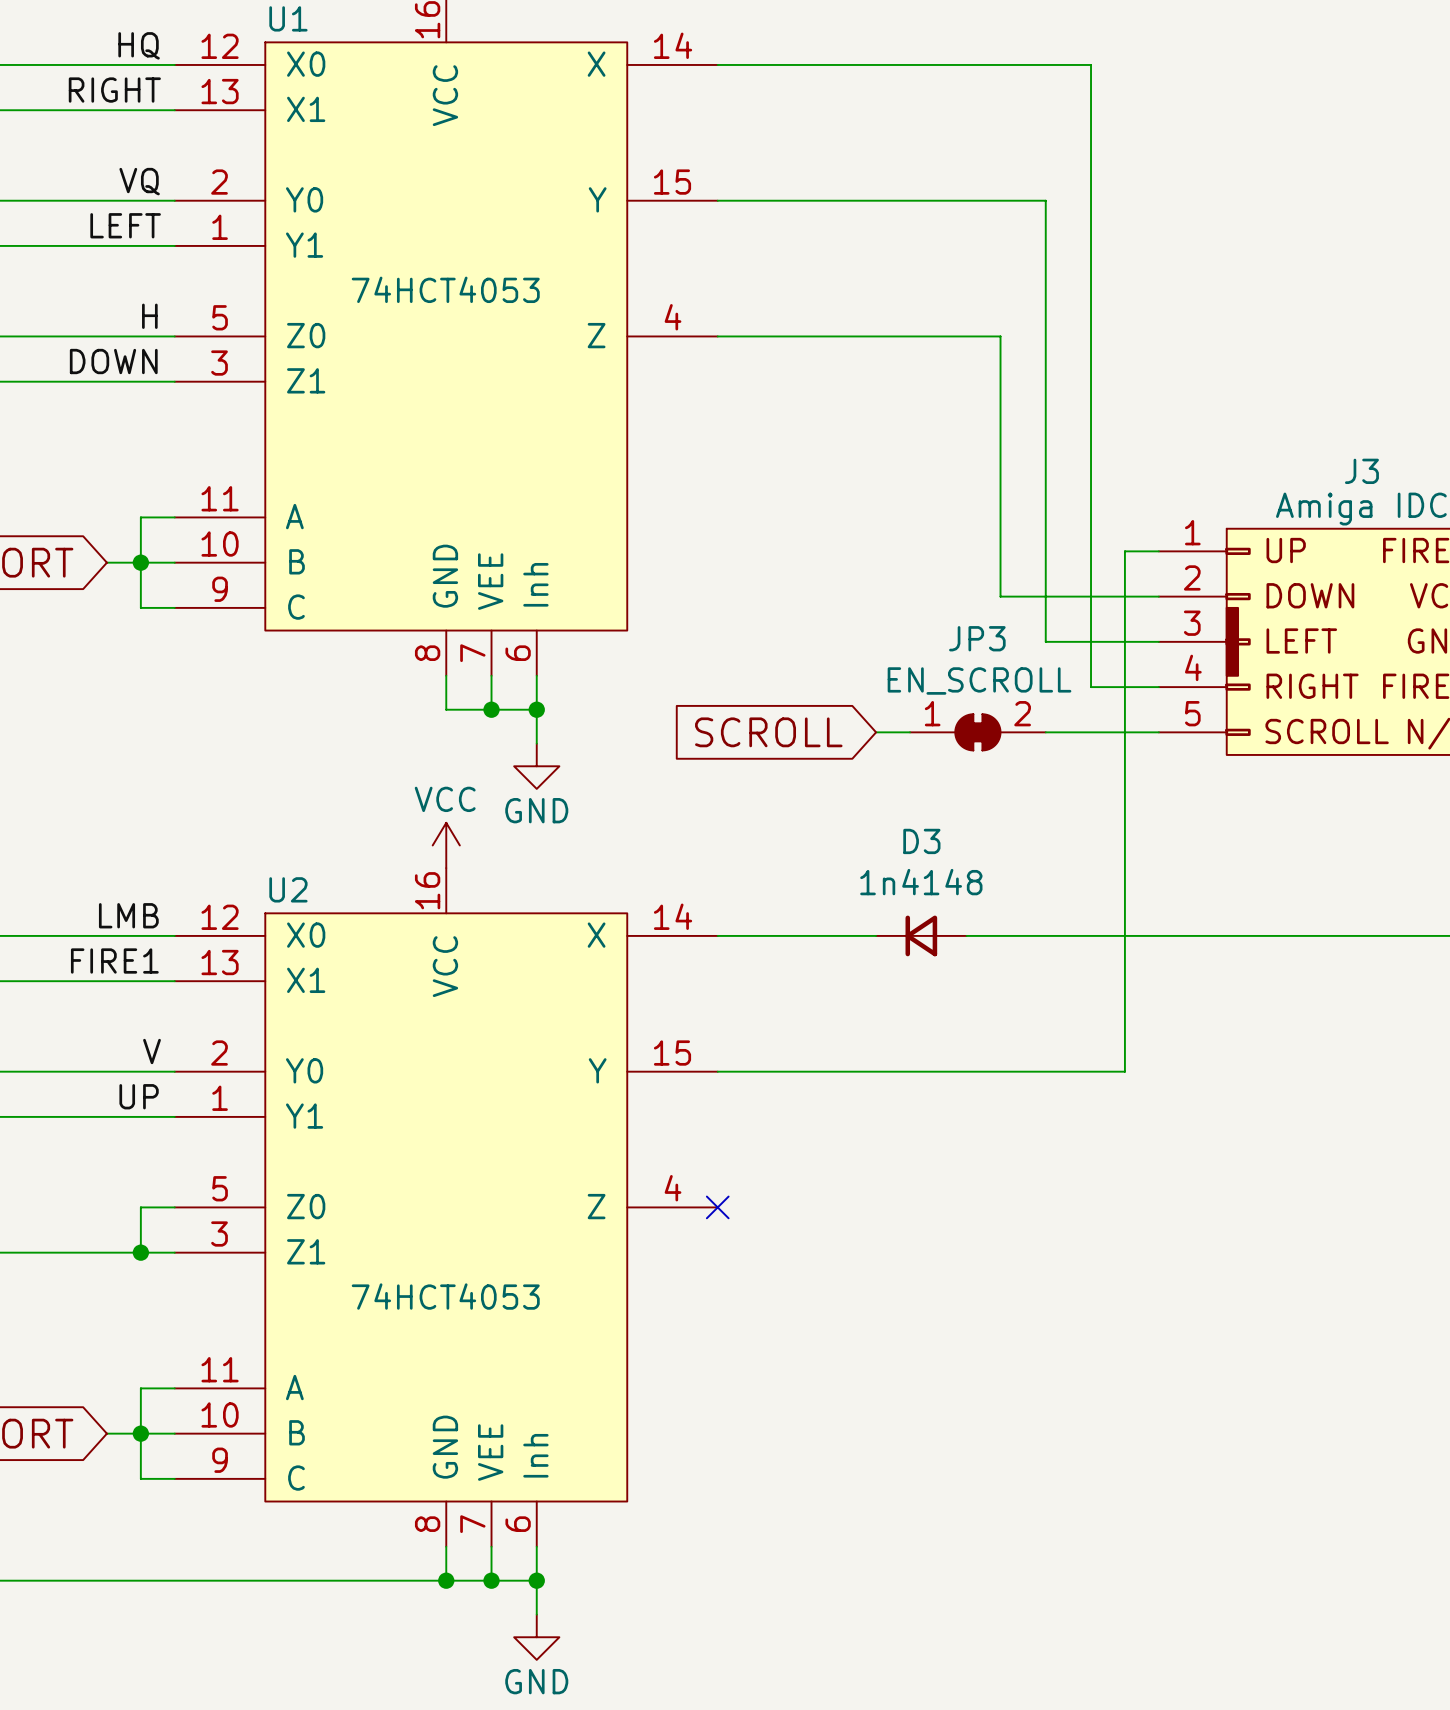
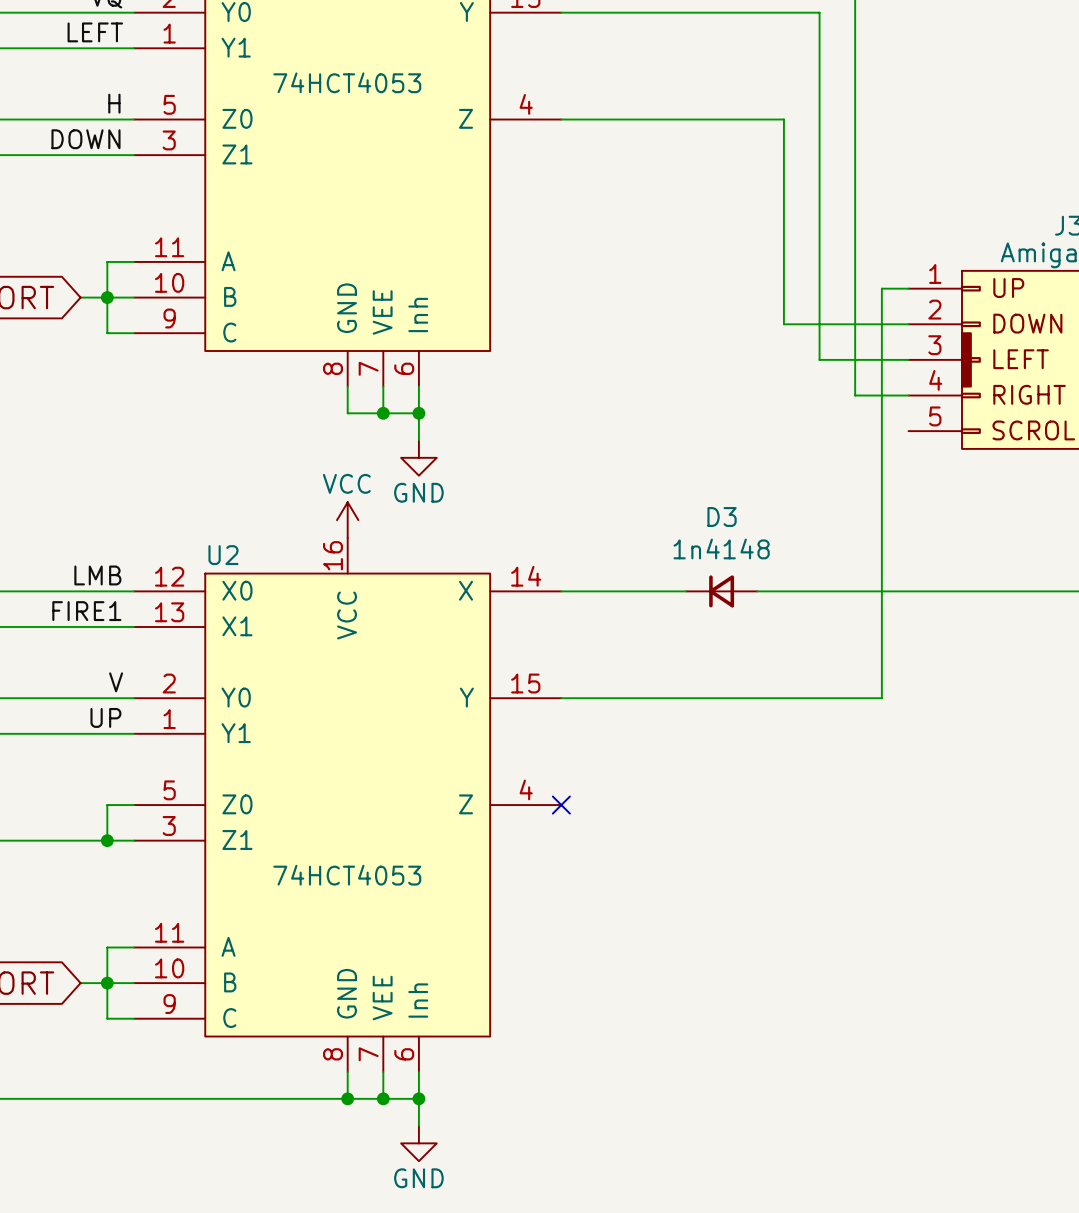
global label: SCROLL (768, 732) -> none
wire: (876, 732) (910, 732) -> none
JP3: EN_SCROLL (977, 732) -> none
wire: (1045, 732) (1158, 732) -> none

